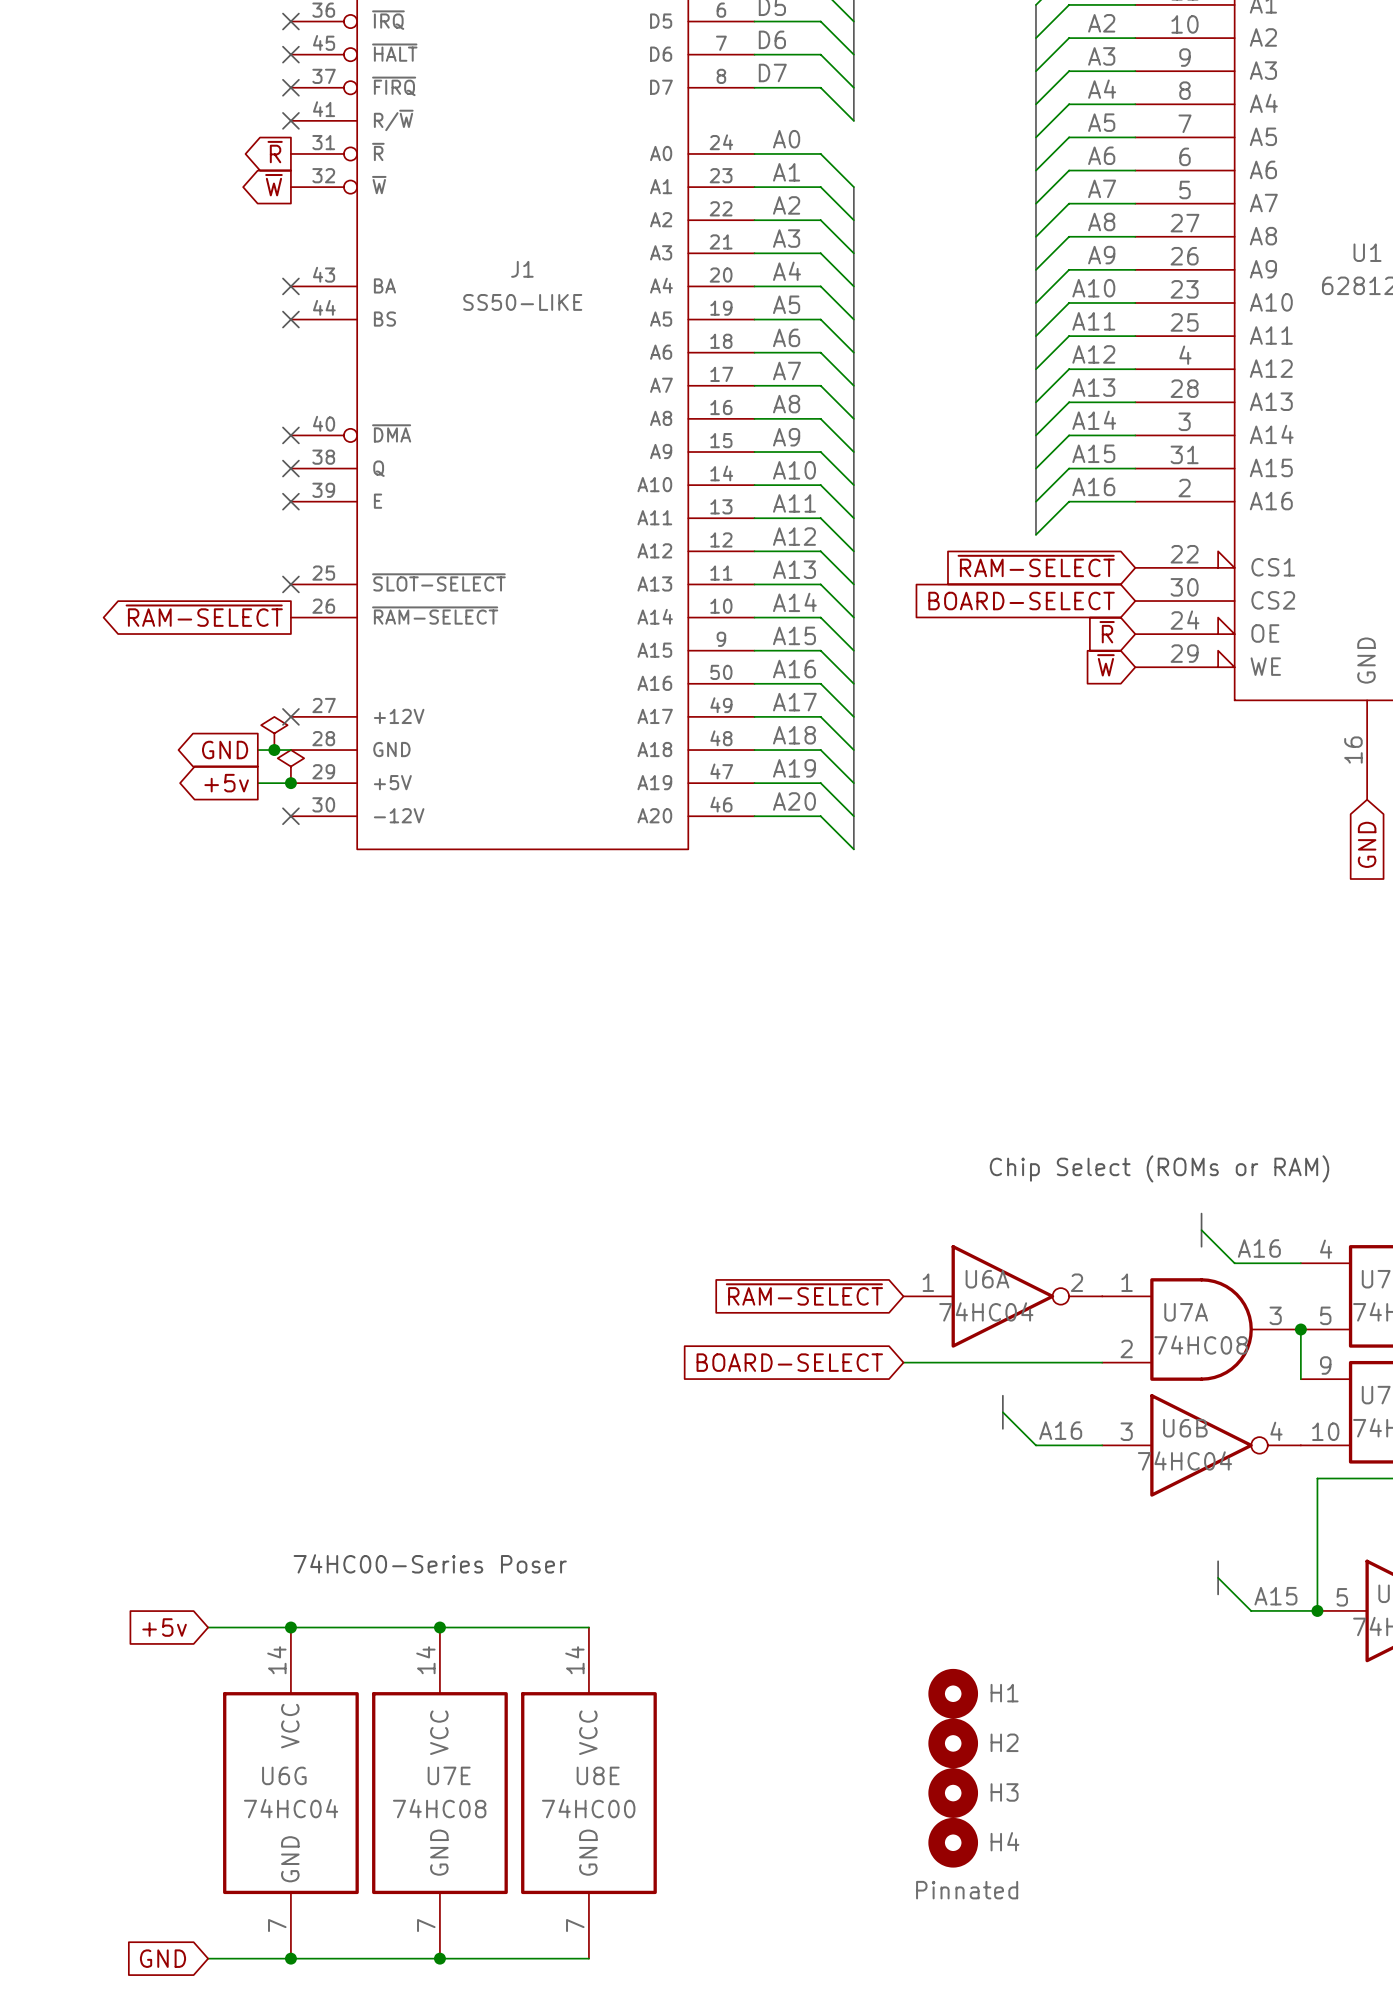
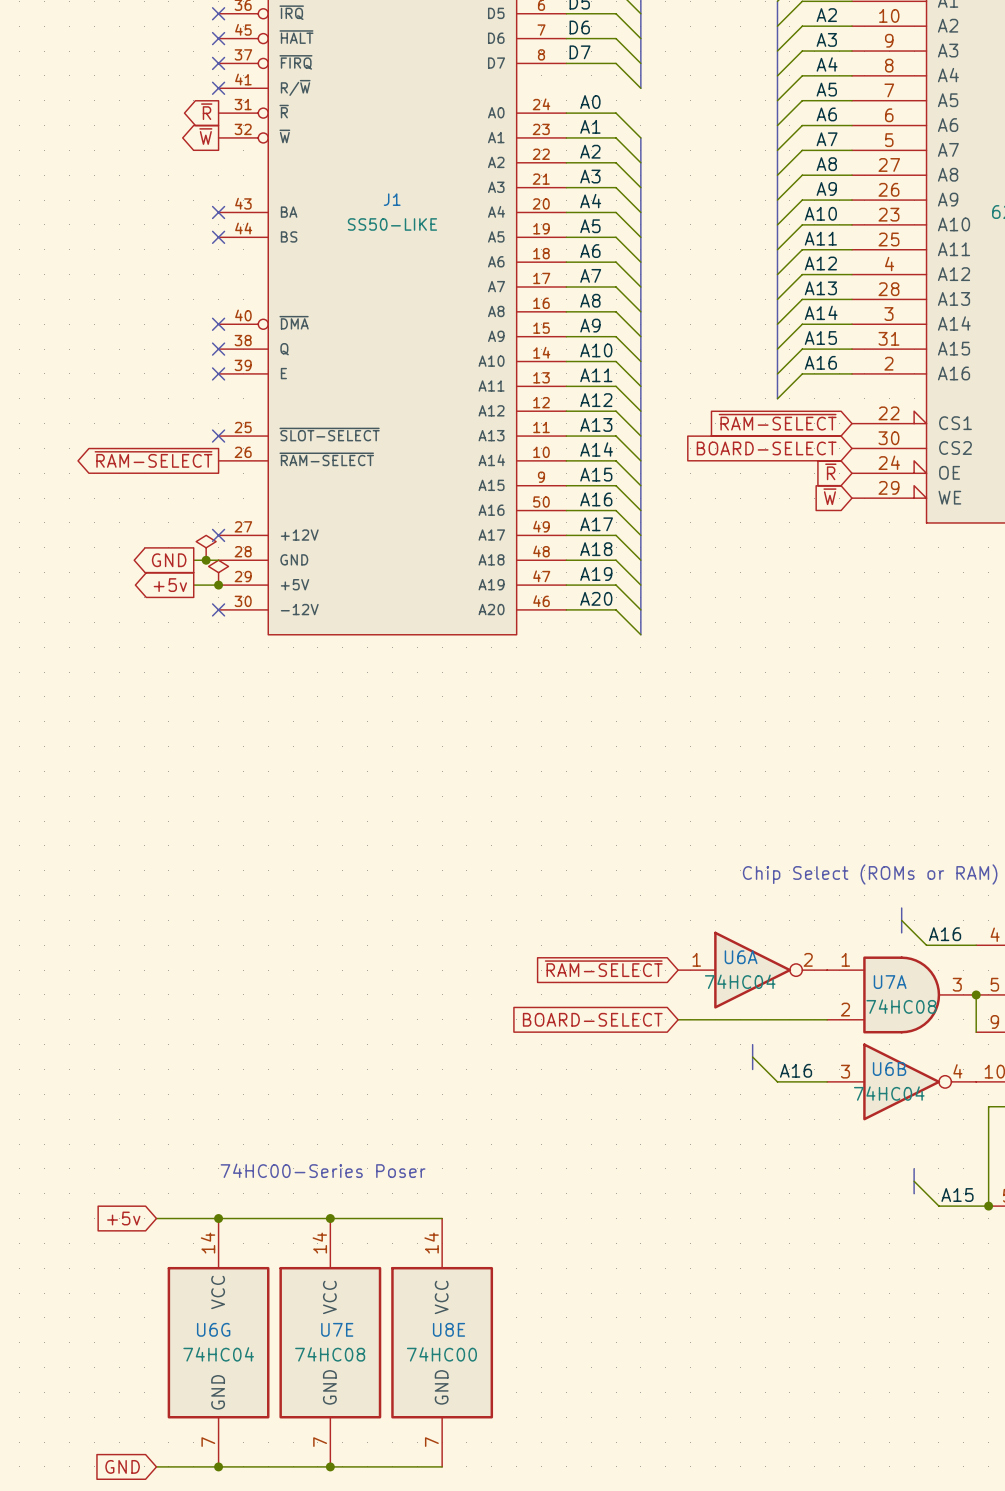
H1: (953, 1693) -> none
H2: (953, 1743) -> none
H3: (953, 1793) -> none
H4: (953, 1842) -> none
part: Pinnated (967, 1890) -> none

